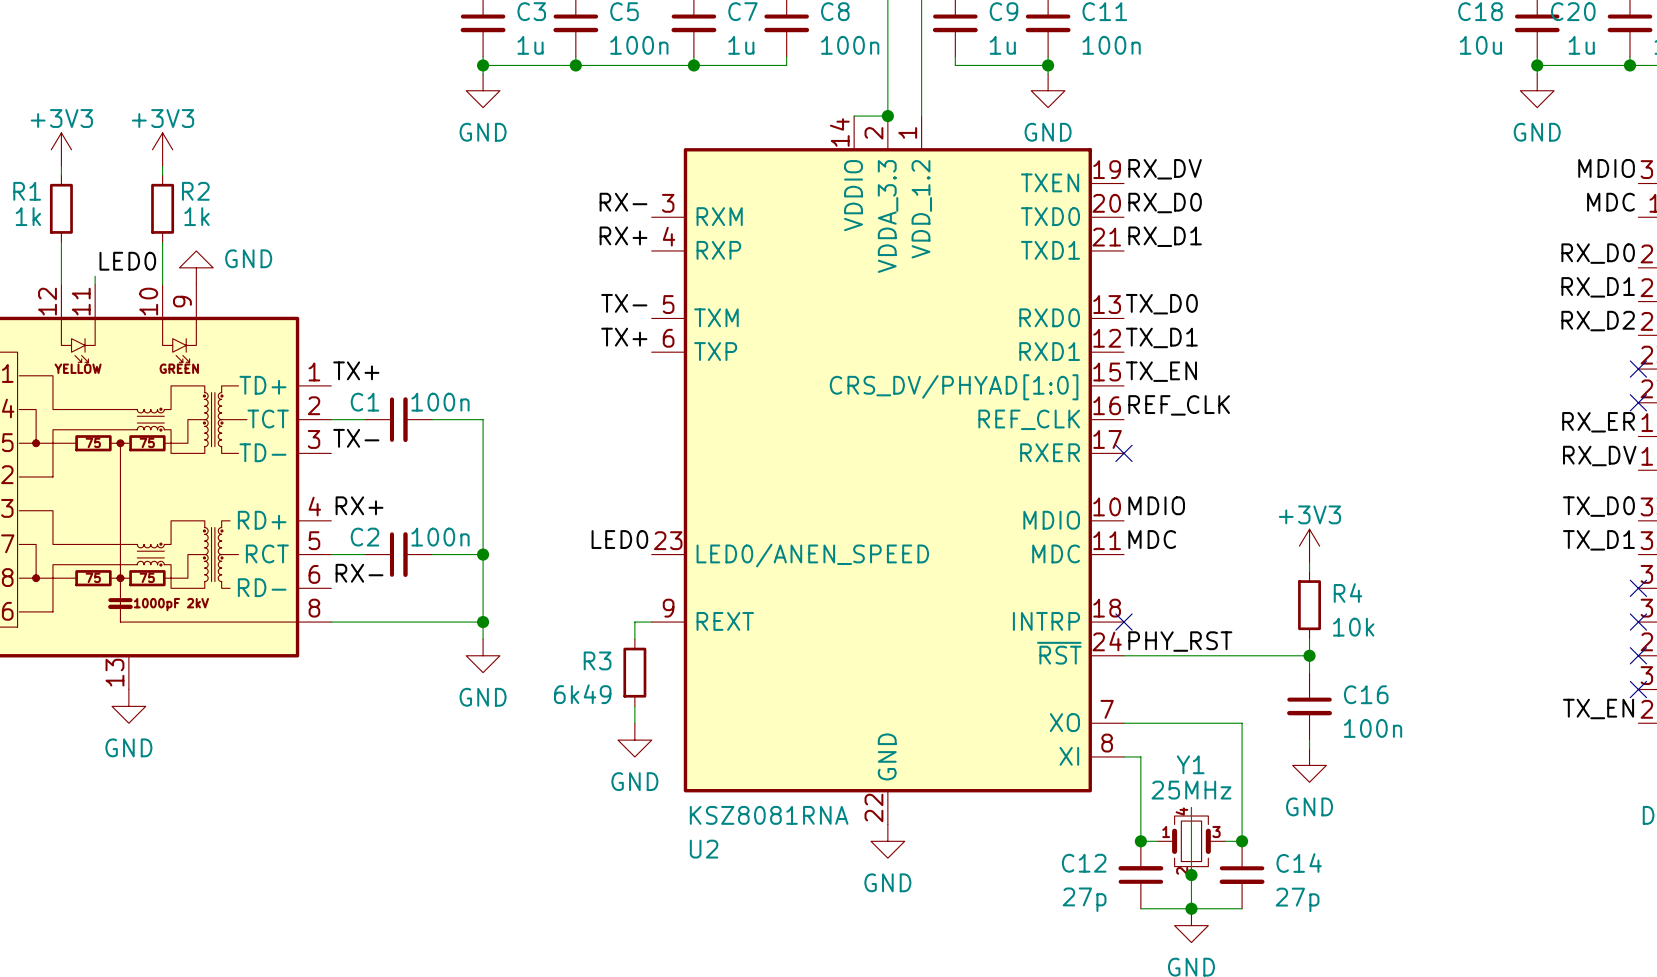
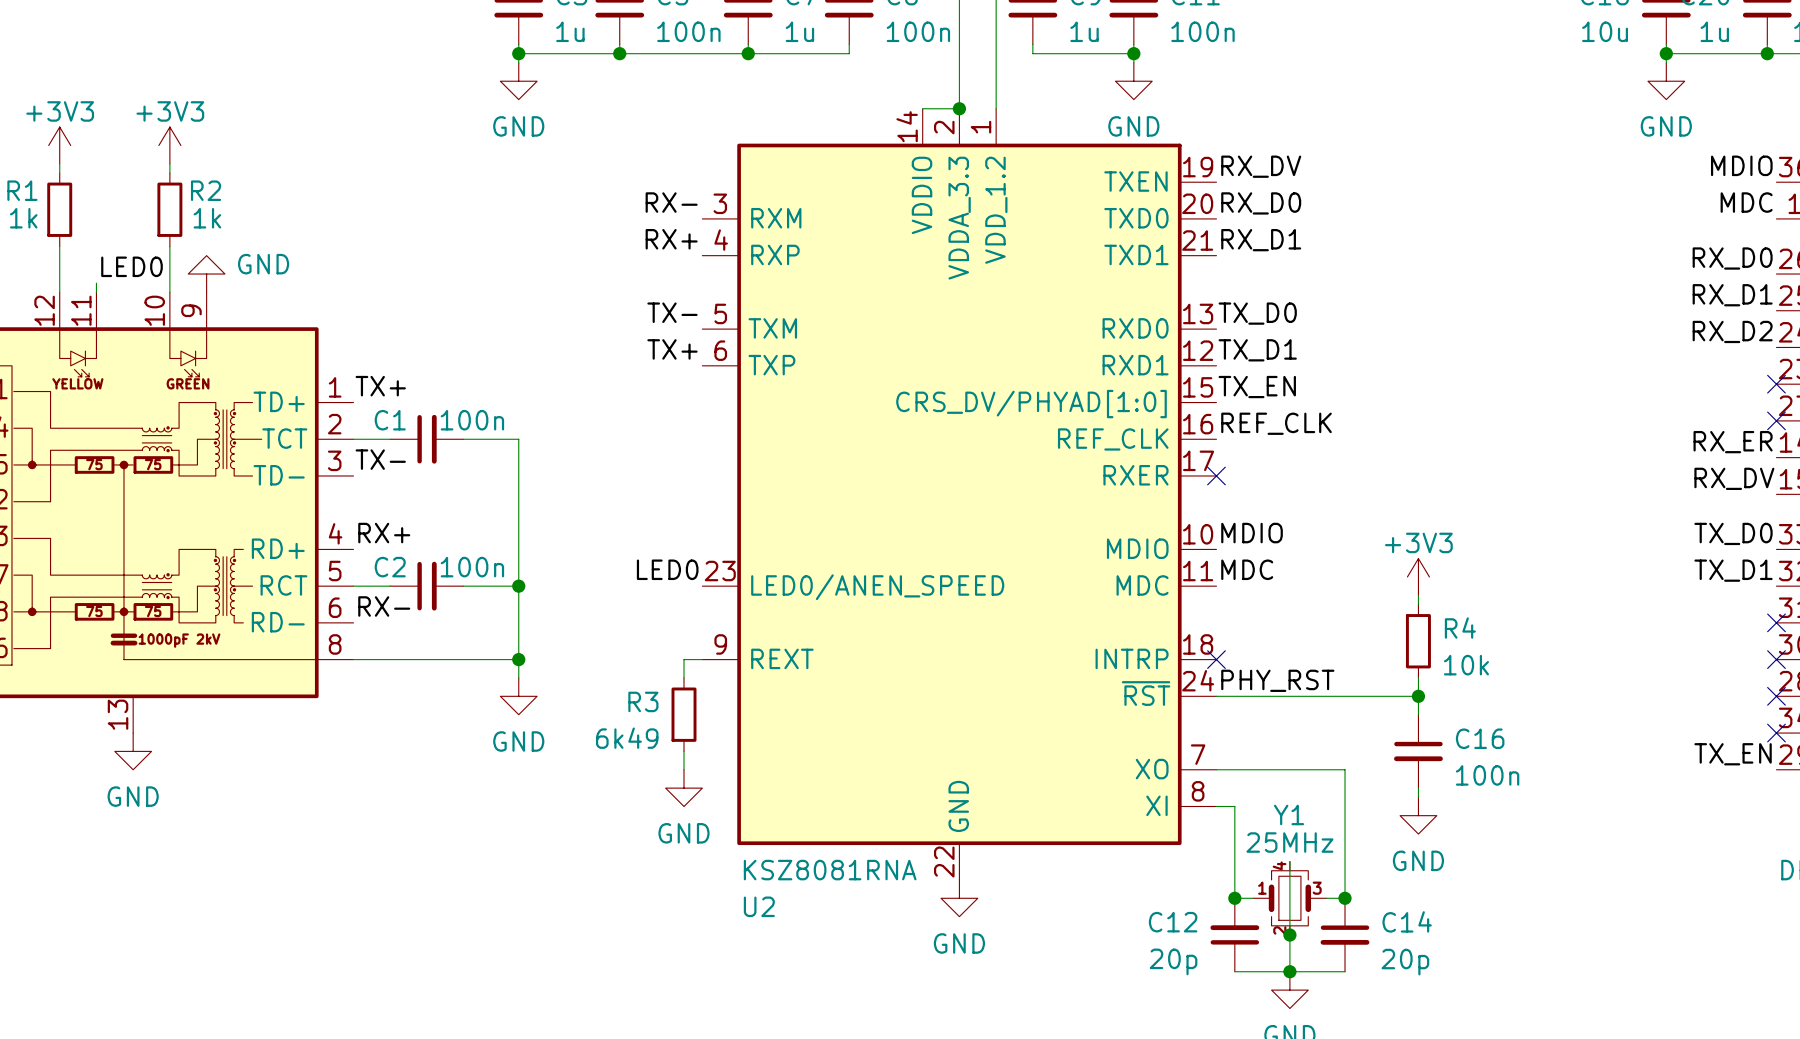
C12 value: 27p (1084, 899) -> 20p (1173, 961)
C14 value: 27p (1297, 899) -> 20p (1405, 962)

